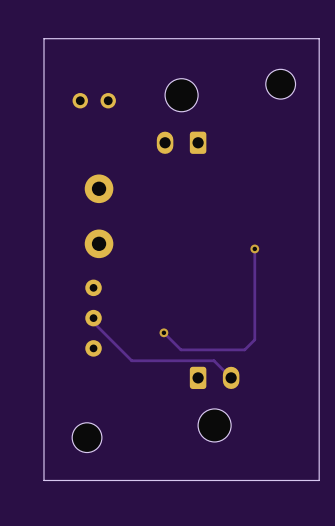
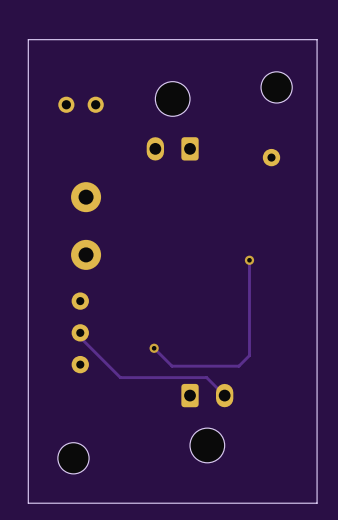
part: none -> (271, 157)

